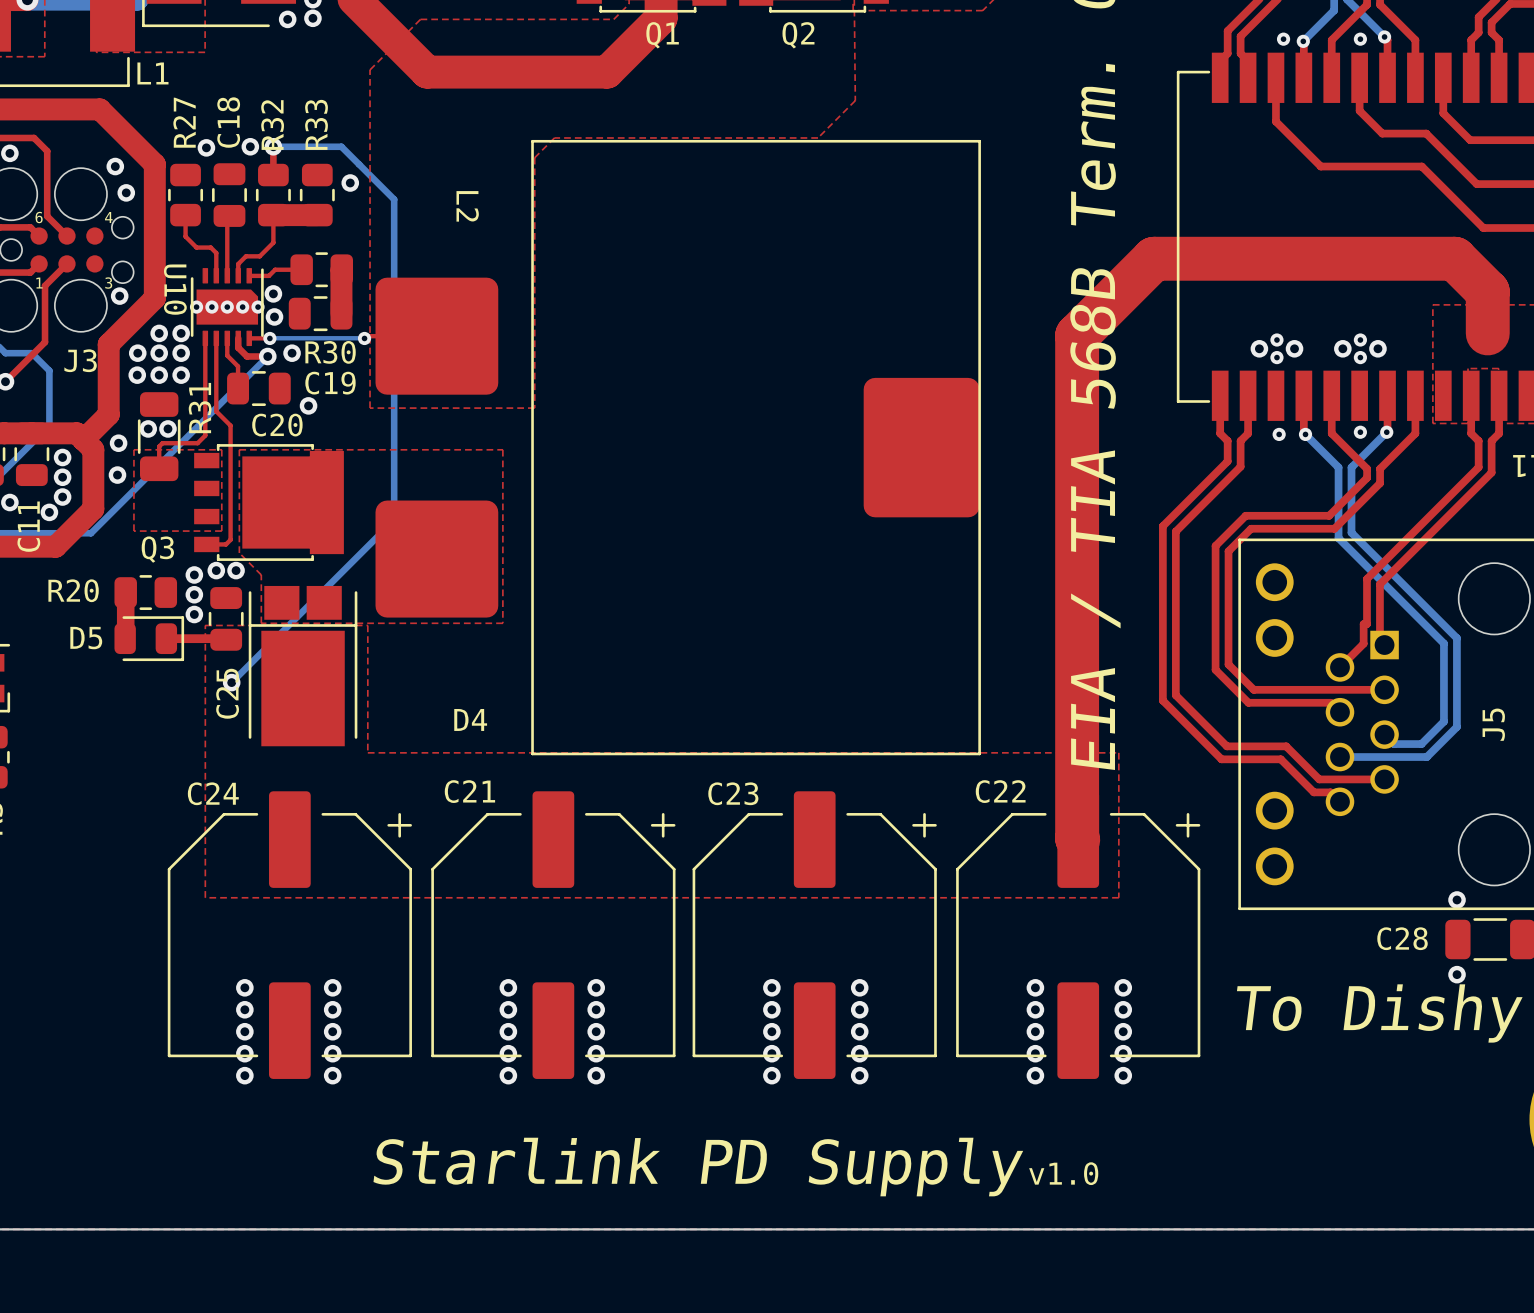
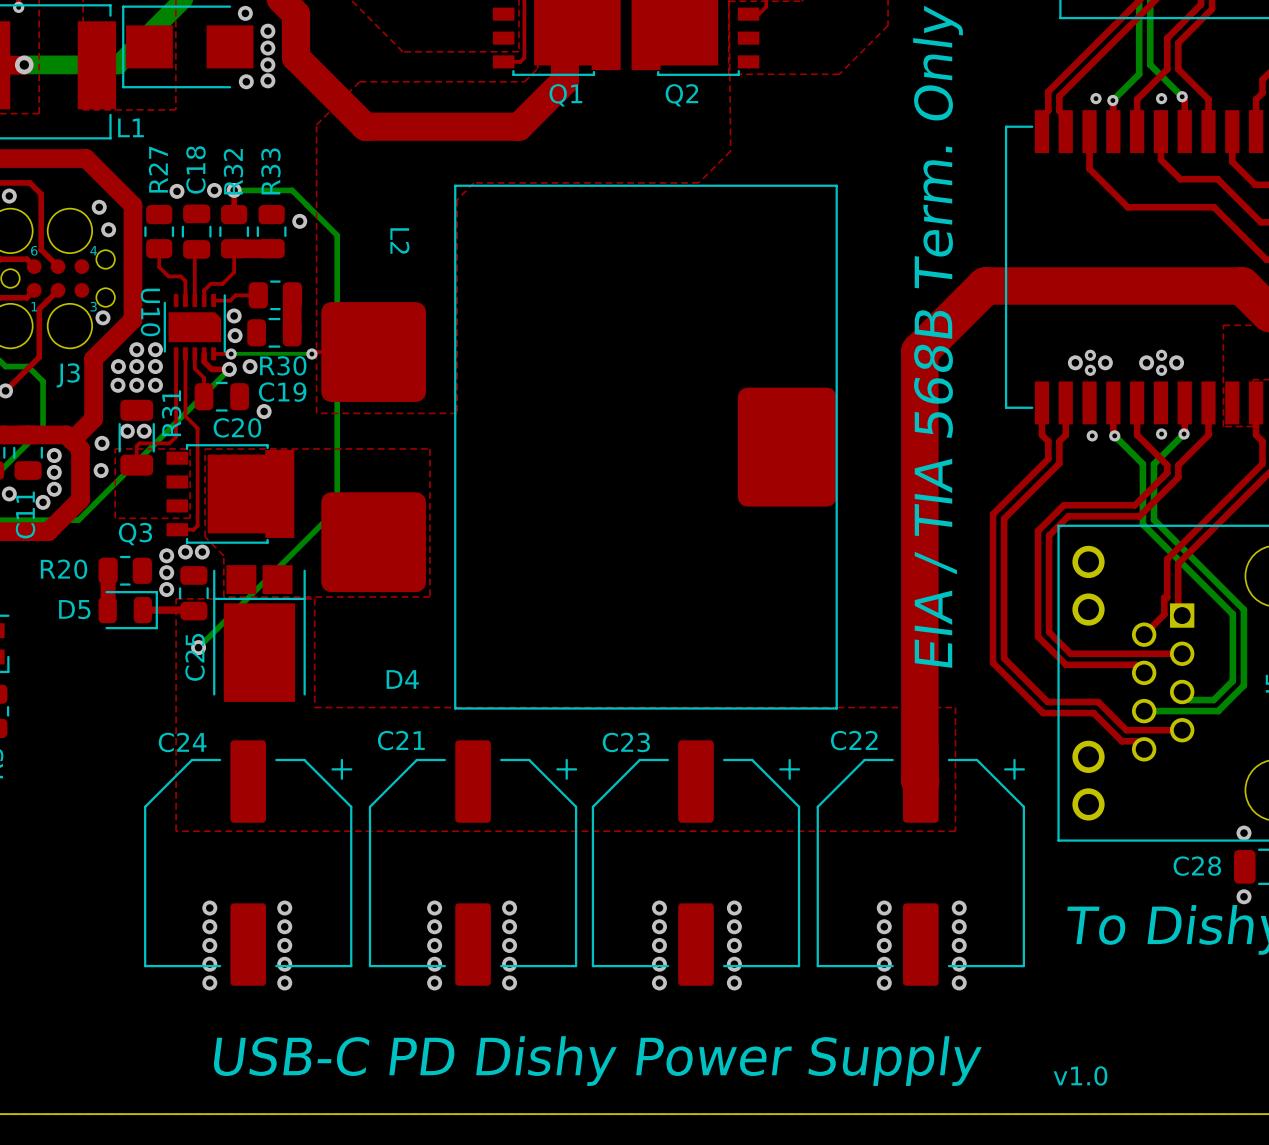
via: (196, 307) -> none
via: (211, 307) -> none
via: (227, 307) -> none
via: (242, 307) -> none
via: (258, 307) -> none
text: Starlink PD Supply (698, 1167) -> USB-C PD Dishy Power Supply (597, 1061)
text position: v1.0 (1063, 1173) -> v1.0 (1080, 1075)

